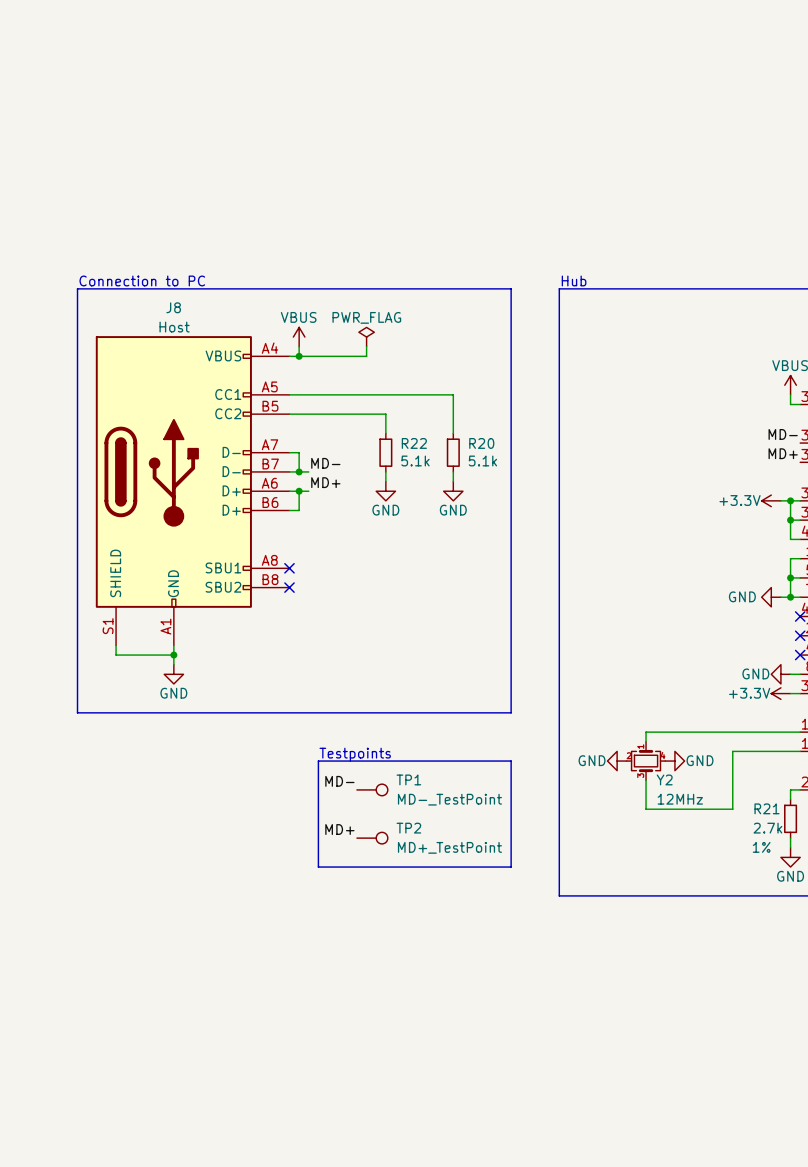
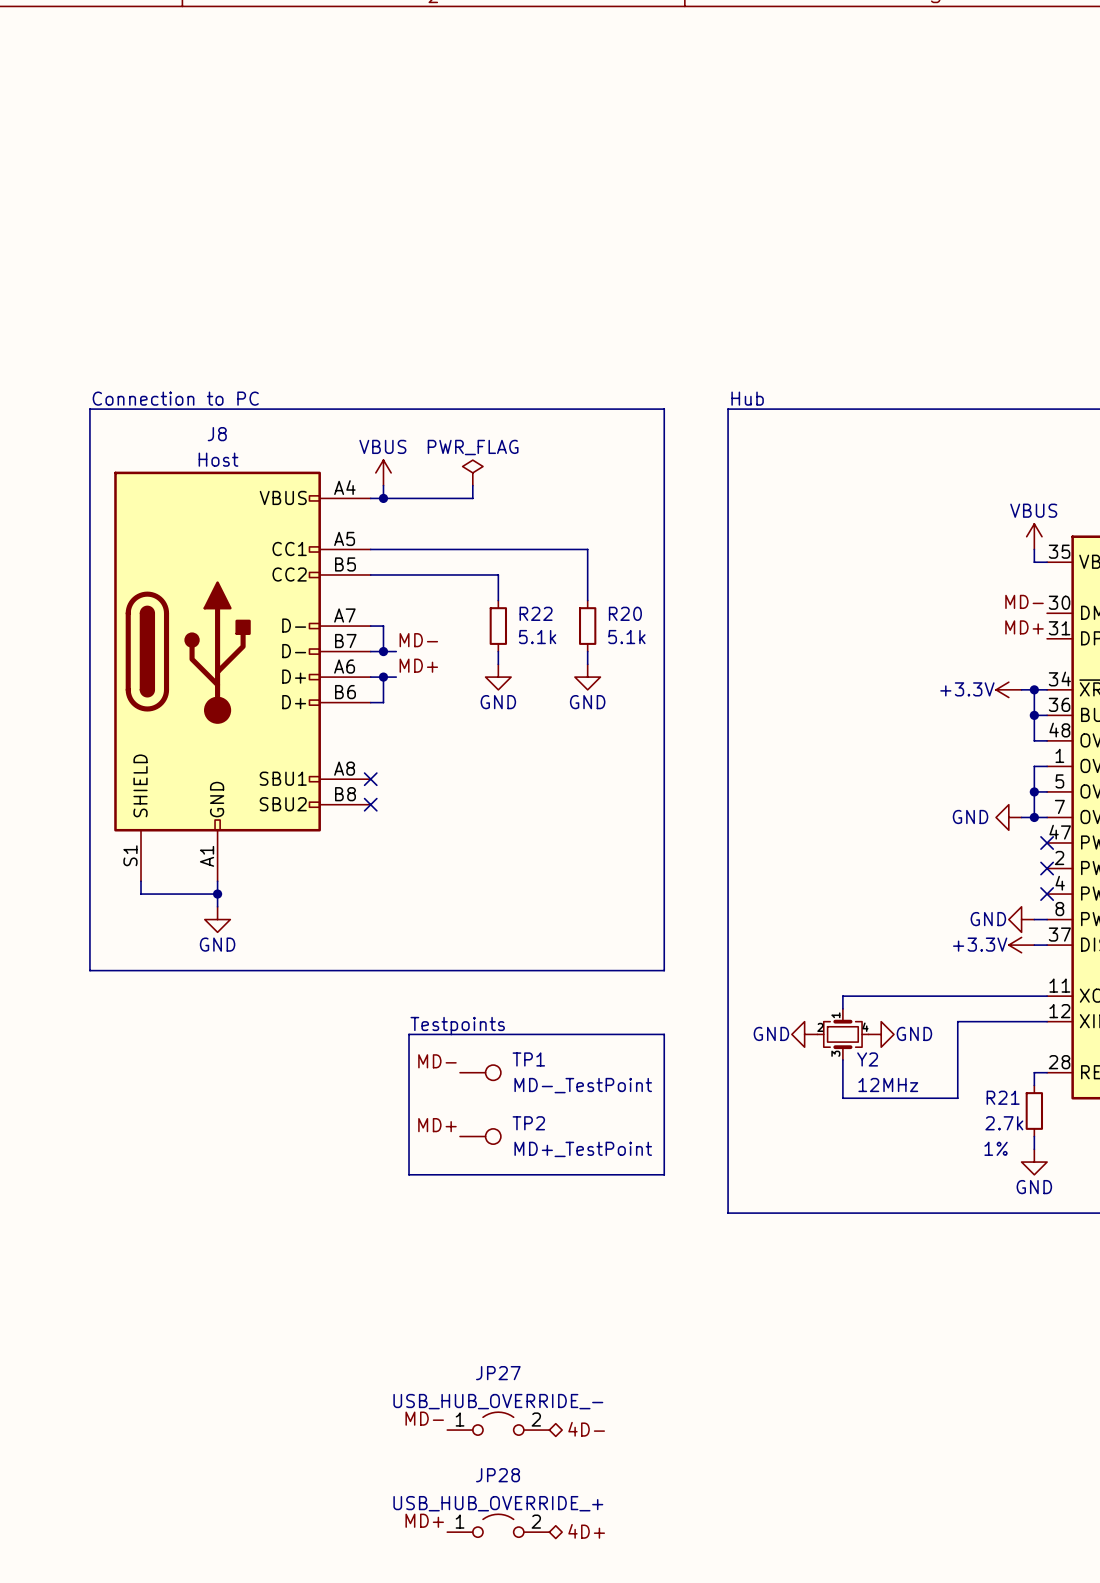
label: none -> MD- (424, 1418)
JP27: none -> USB_HUB_OVERRIDE_- (498, 1423)
hierarchical label: none -> 4D- (586, 1429)
label: none -> MD+ (424, 1520)
JP28: none -> USB_HUB_OVERRIDE_+ (498, 1525)
hierarchical label: none -> 4D+ (586, 1531)

